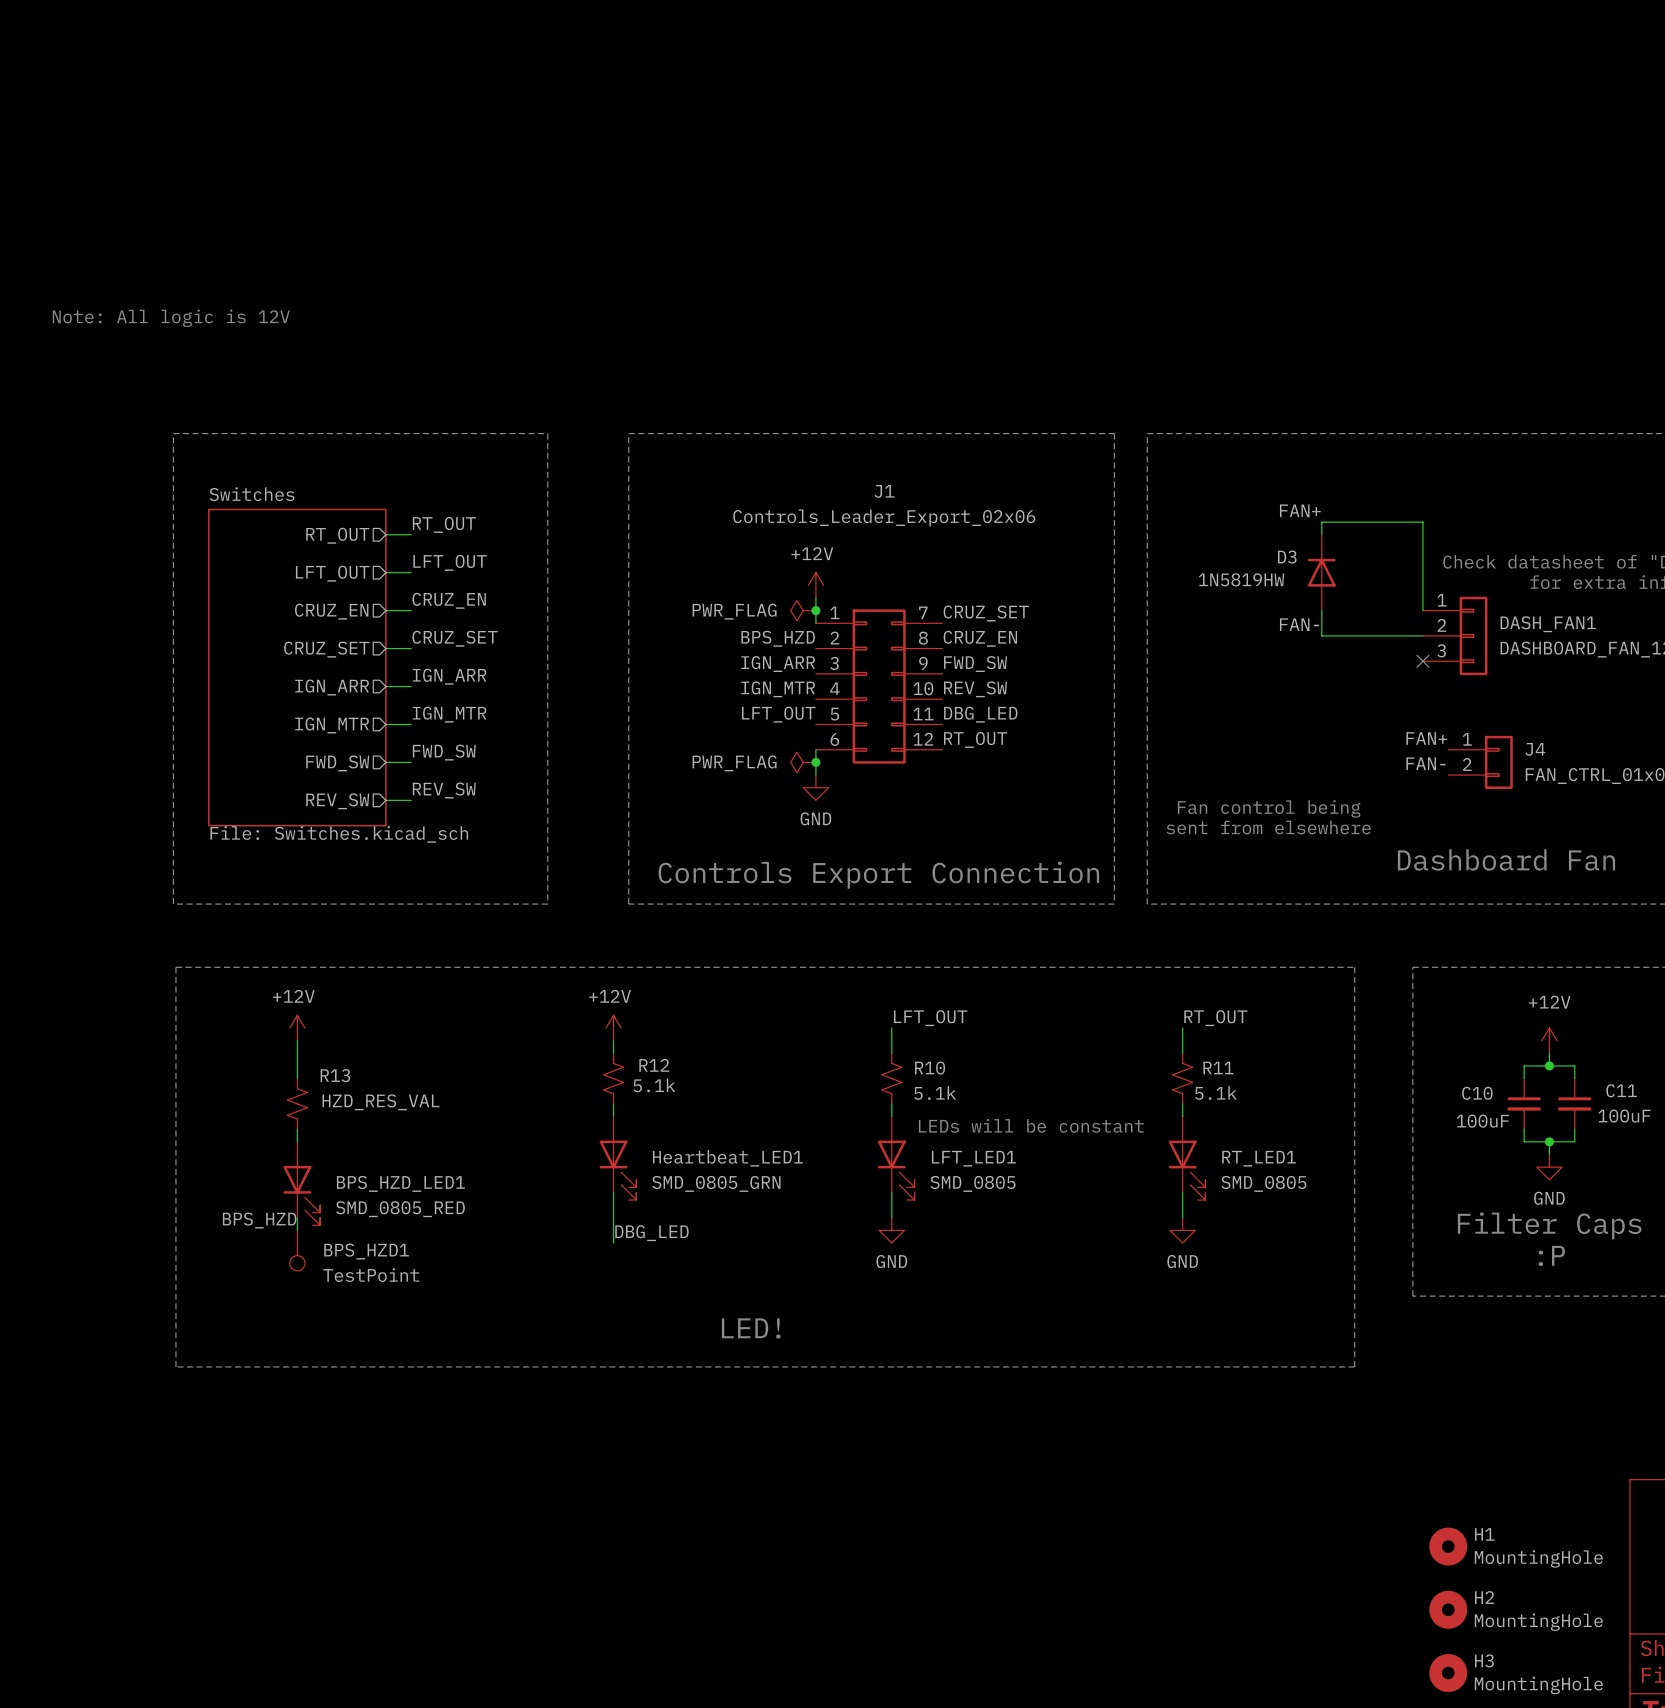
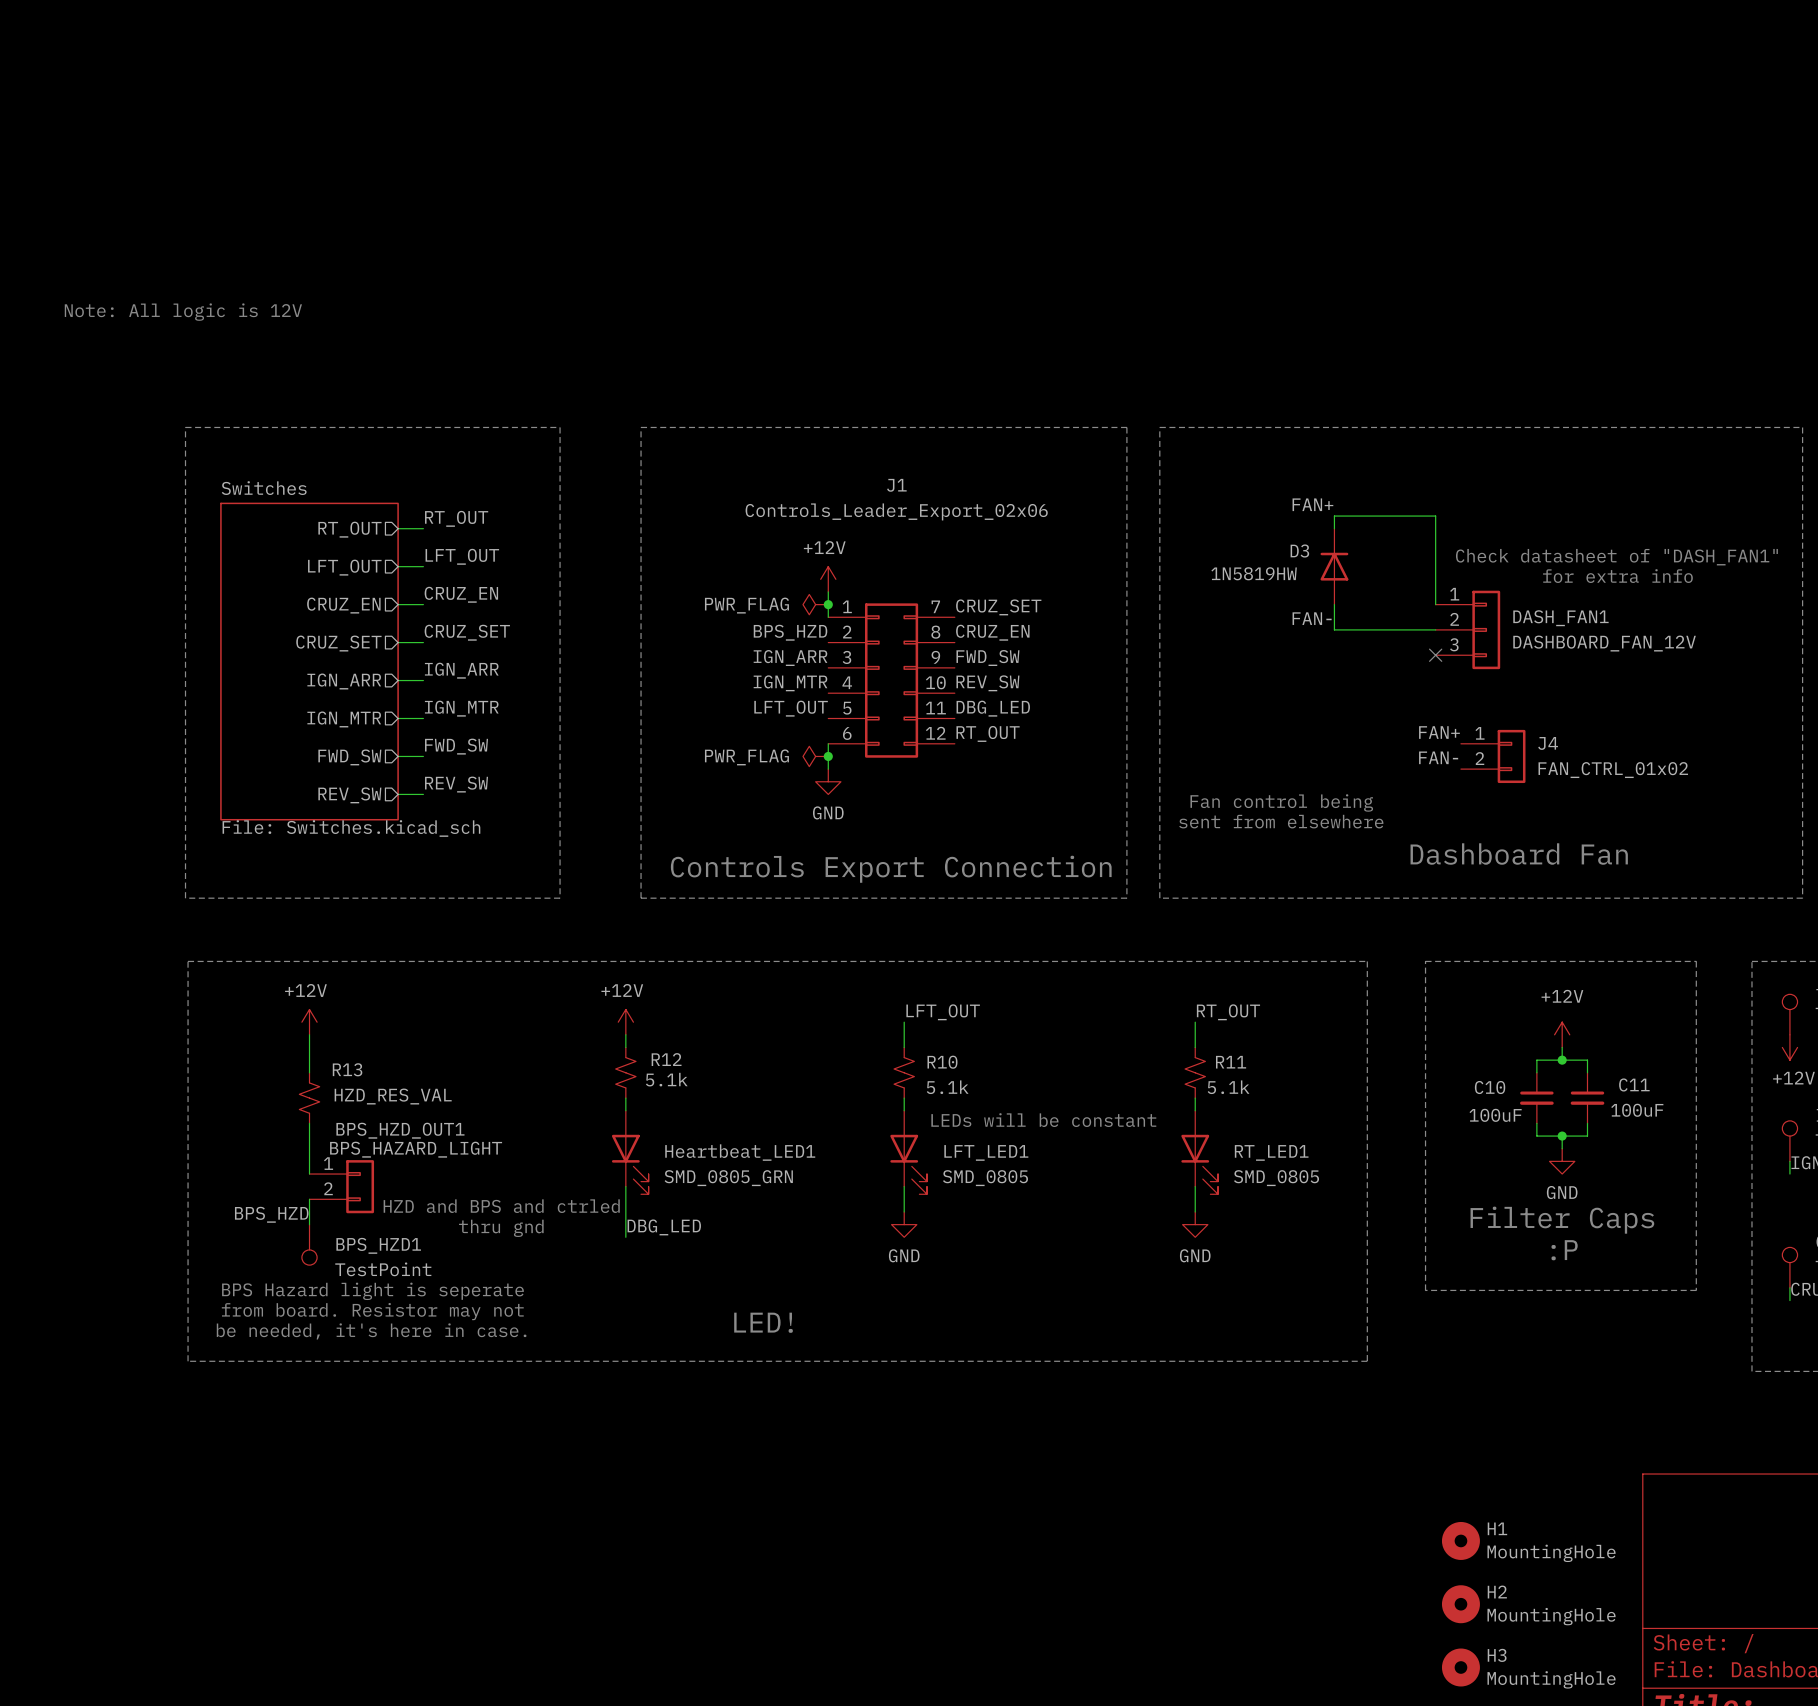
BPS_HZD_LED1: SMD_0805_RED (301, 1183) -> none
BPS_HZD_OUT1: none -> BPS_HAZARD_LIGHT (341, 1186)
text: none -> HZD and BPS and ctrled (501, 1206)
text: none -> thru gnd (501, 1228)
text: none -> BPS Hazard light is seperate (372, 1291)
text: none -> from board. Resistor may not (372, 1311)
text: none -> be needed, it's here in case. (371, 1331)

